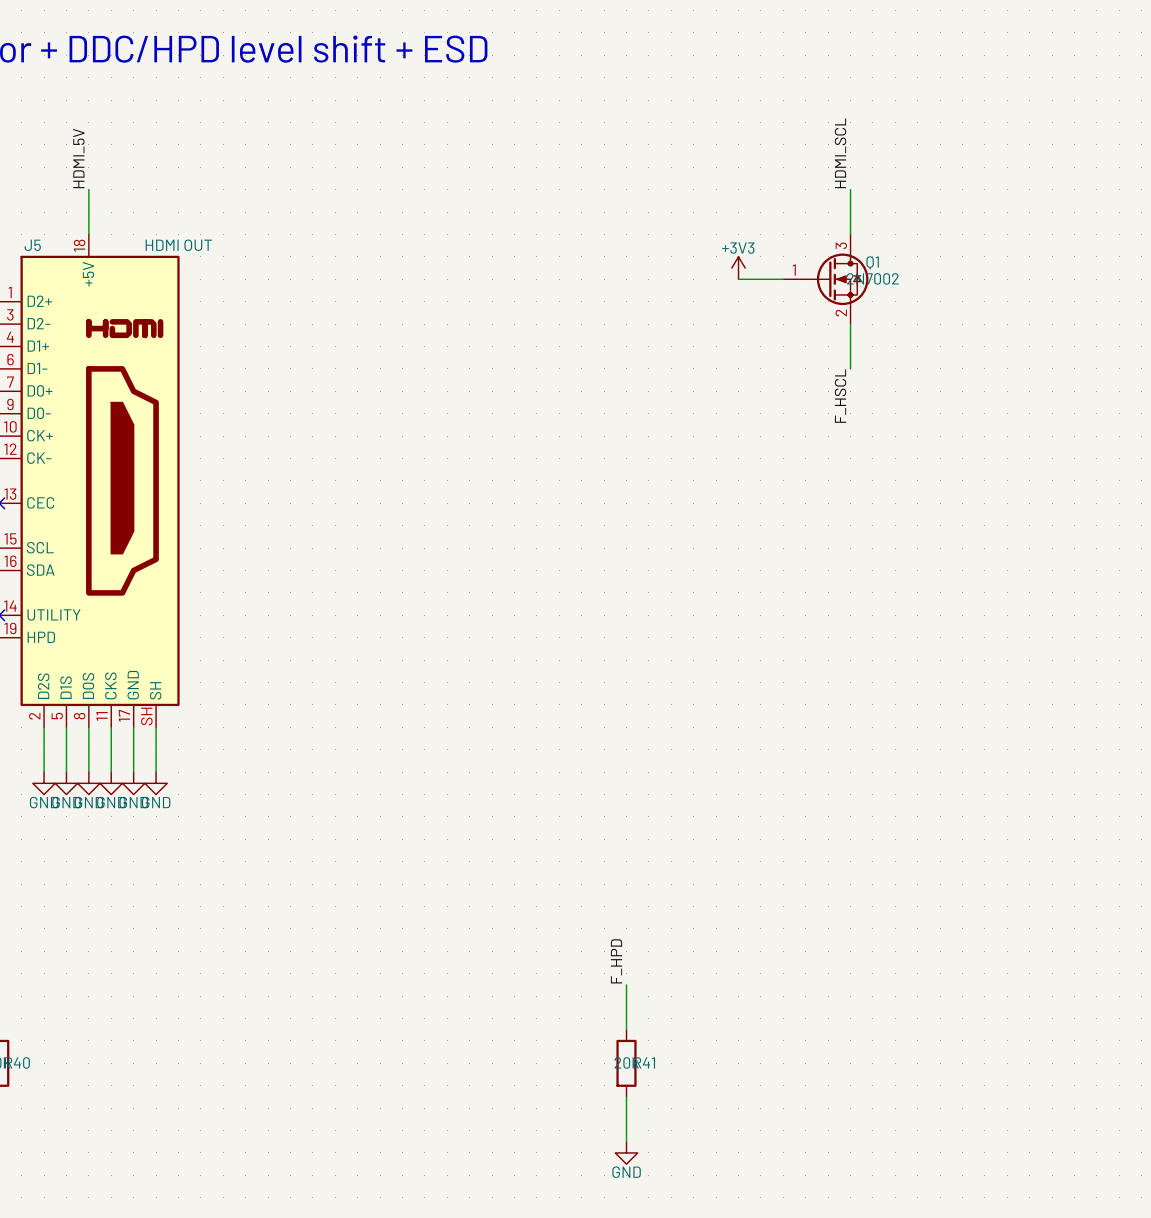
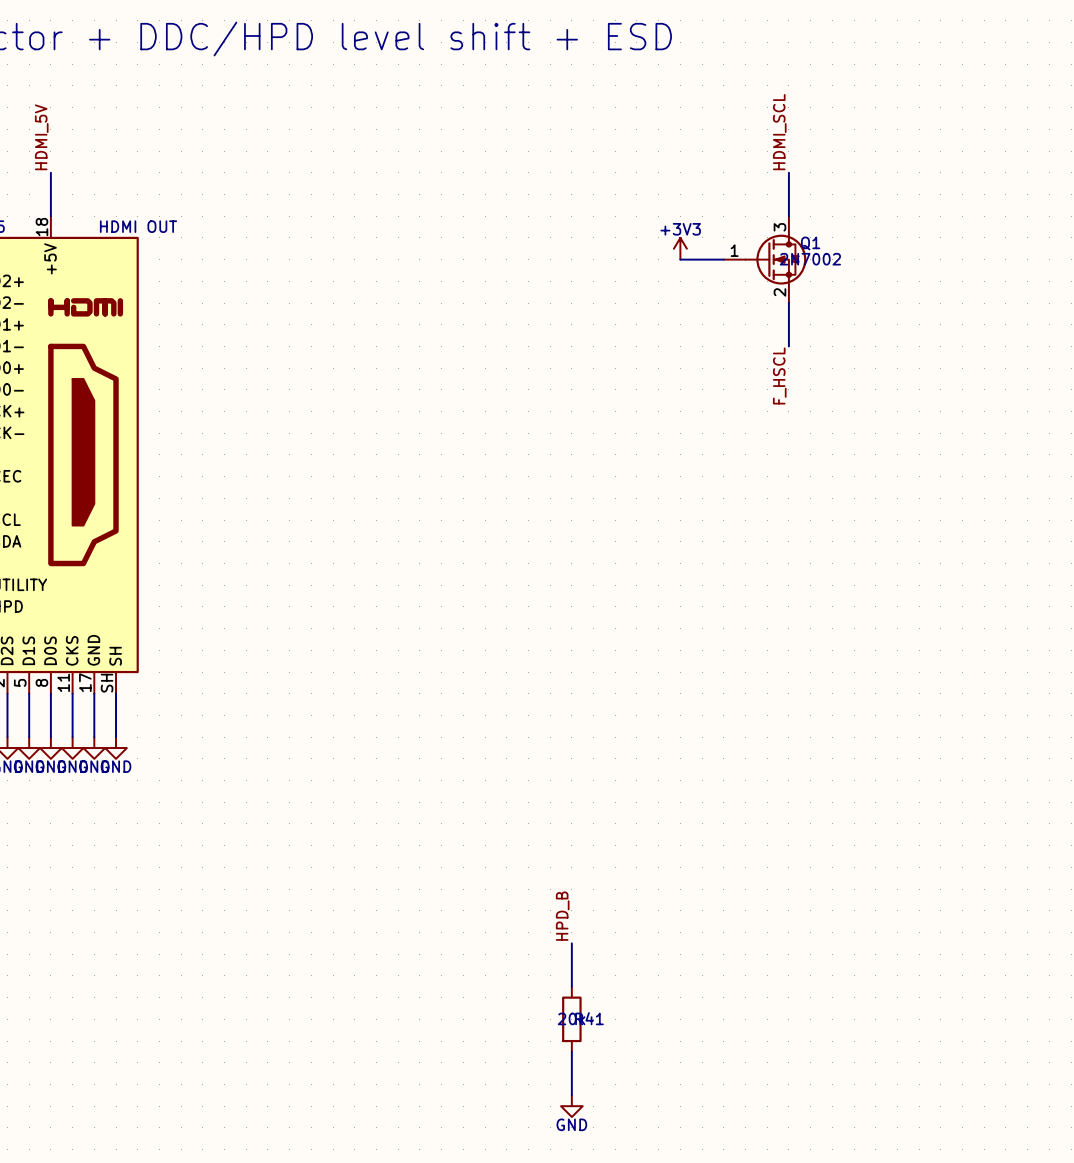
label: F_HPD (616, 961) -> HPD_B (562, 916)

